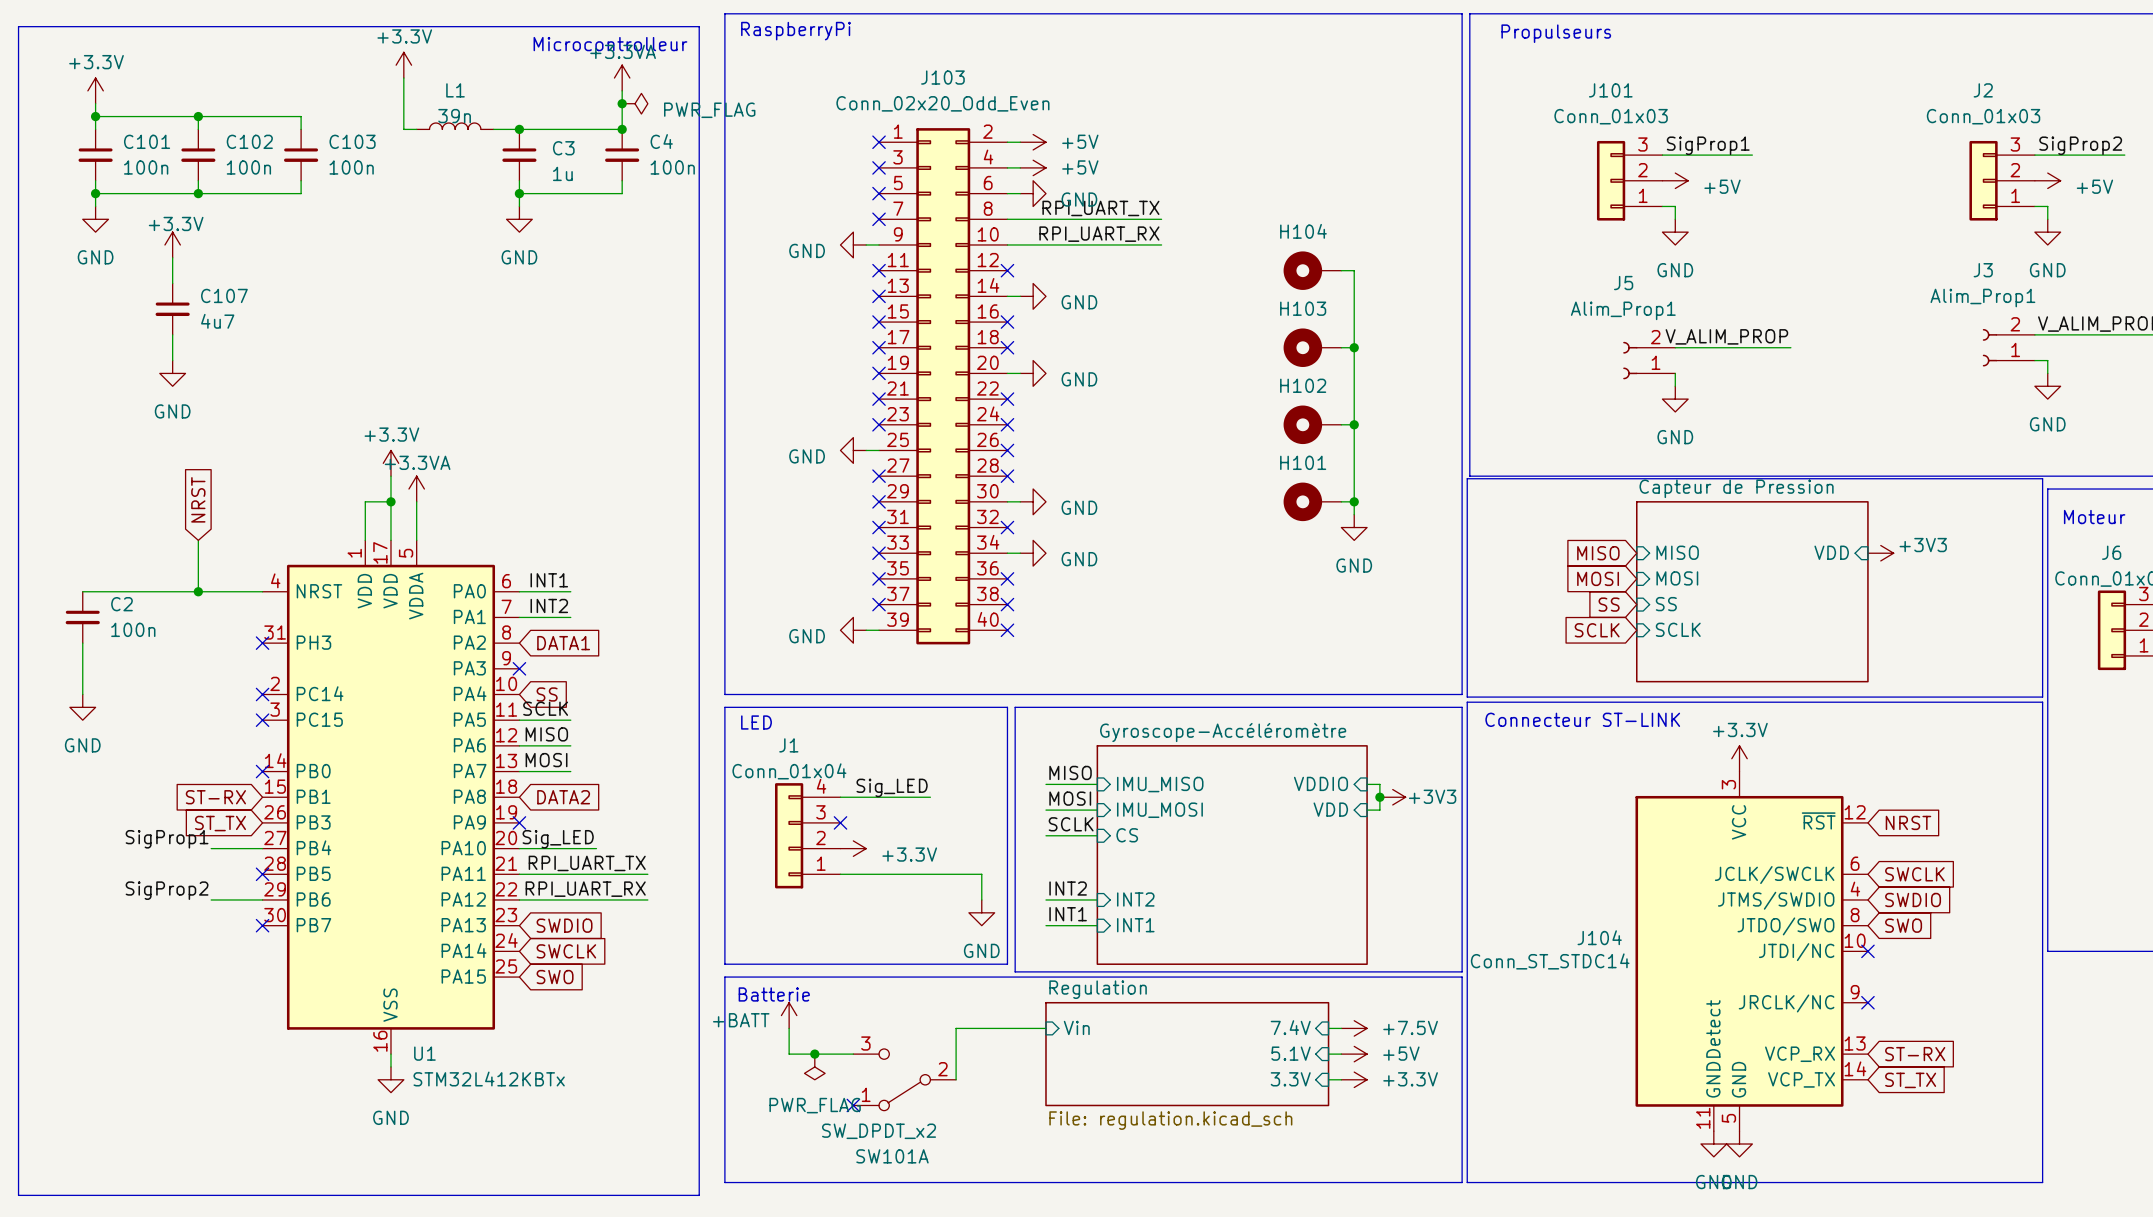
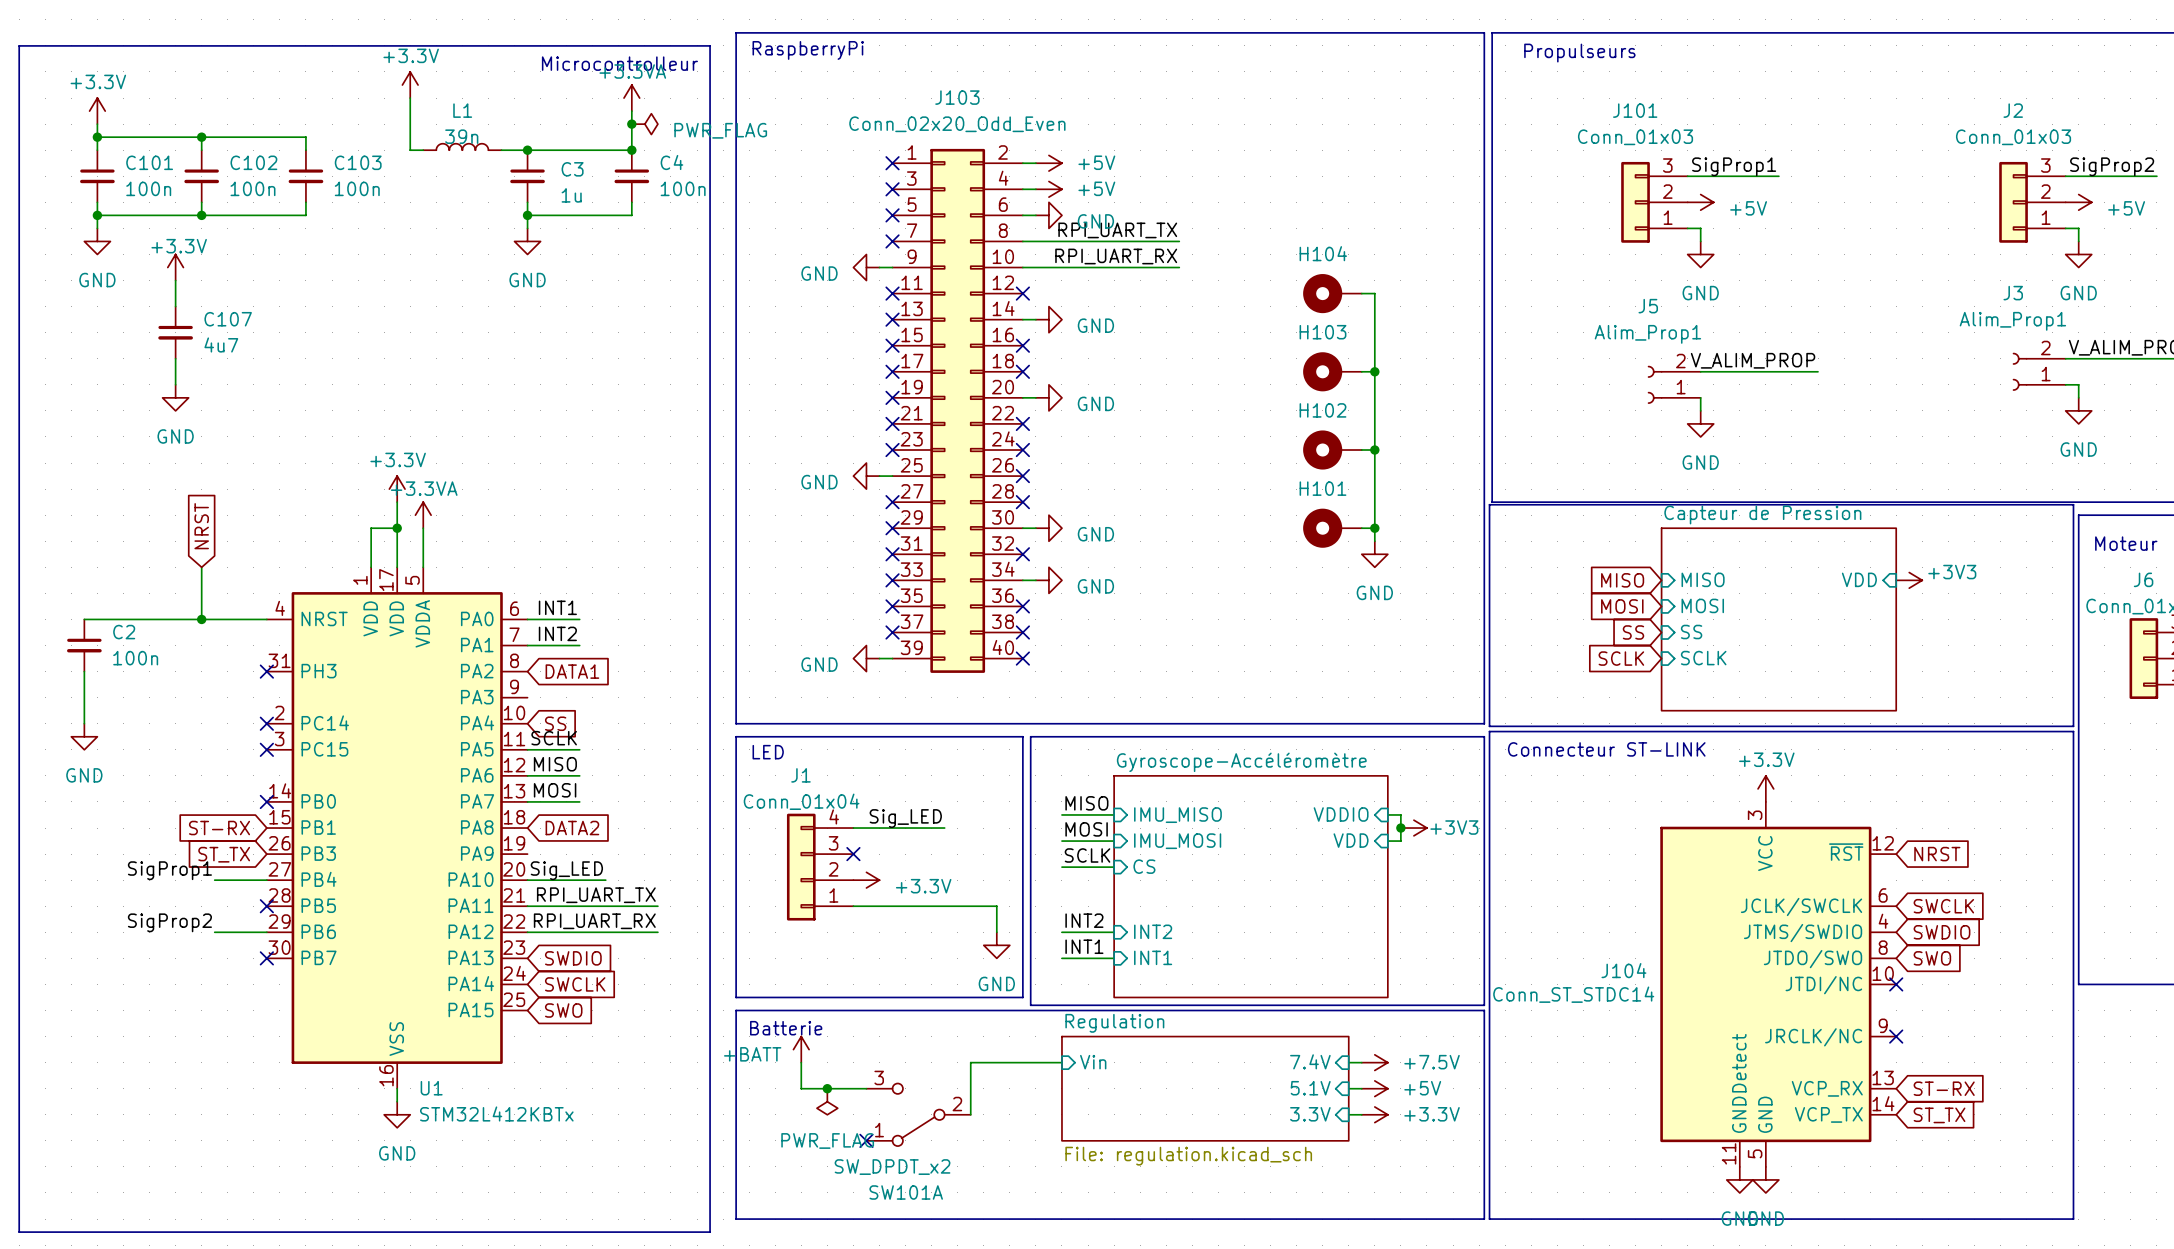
no-connect mark: (519, 668) -> none
no-connect mark: (519, 822) -> none

